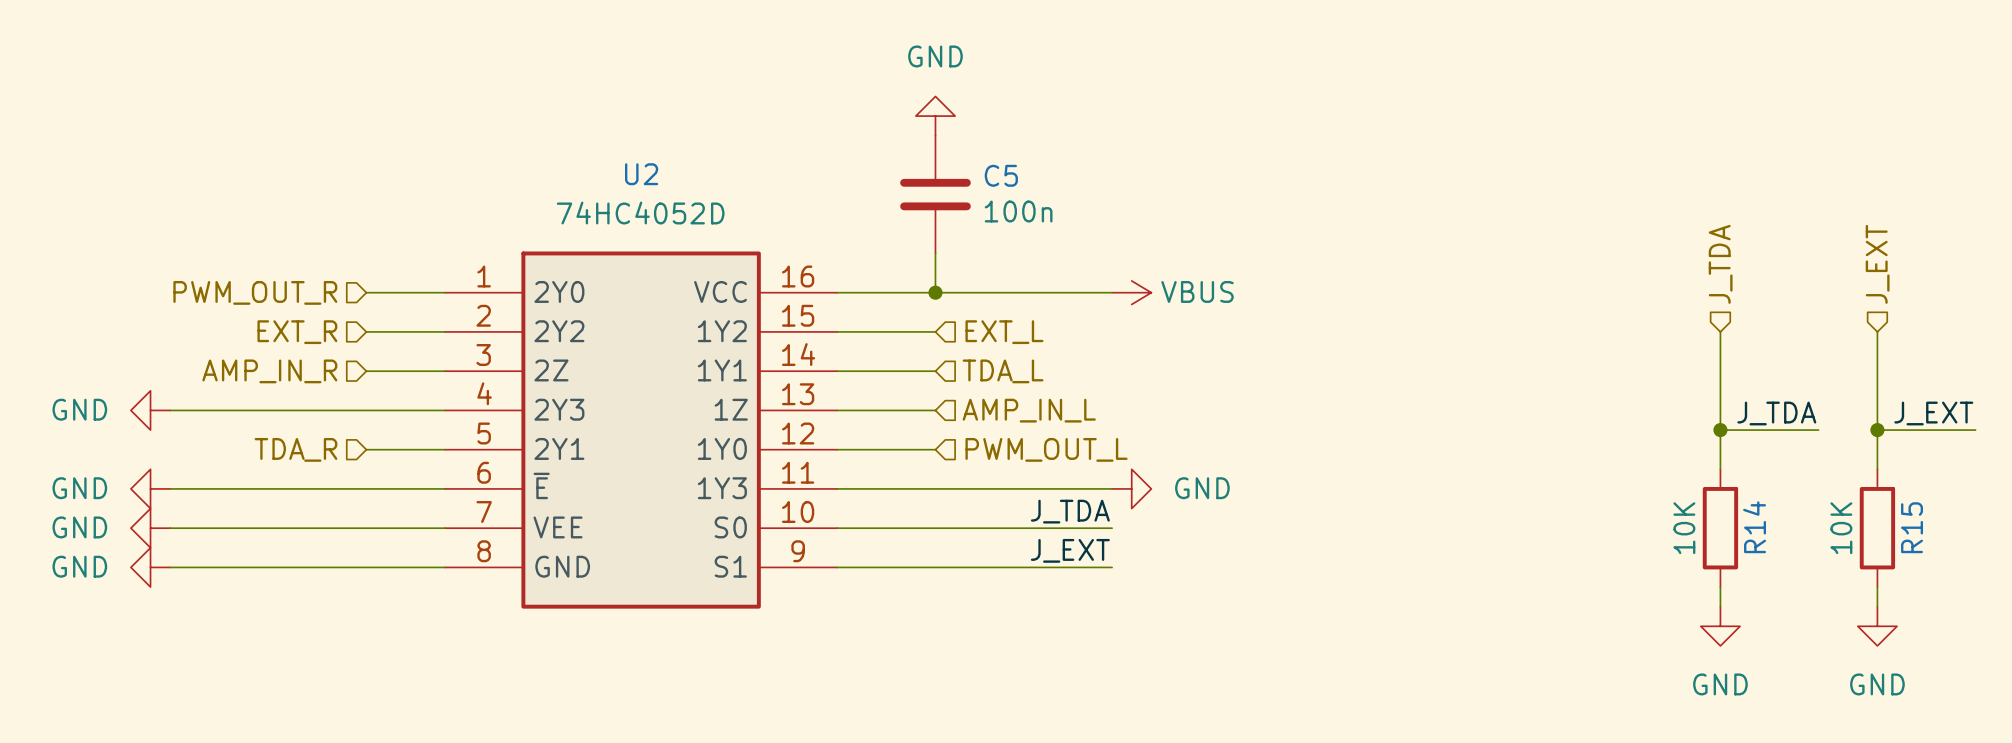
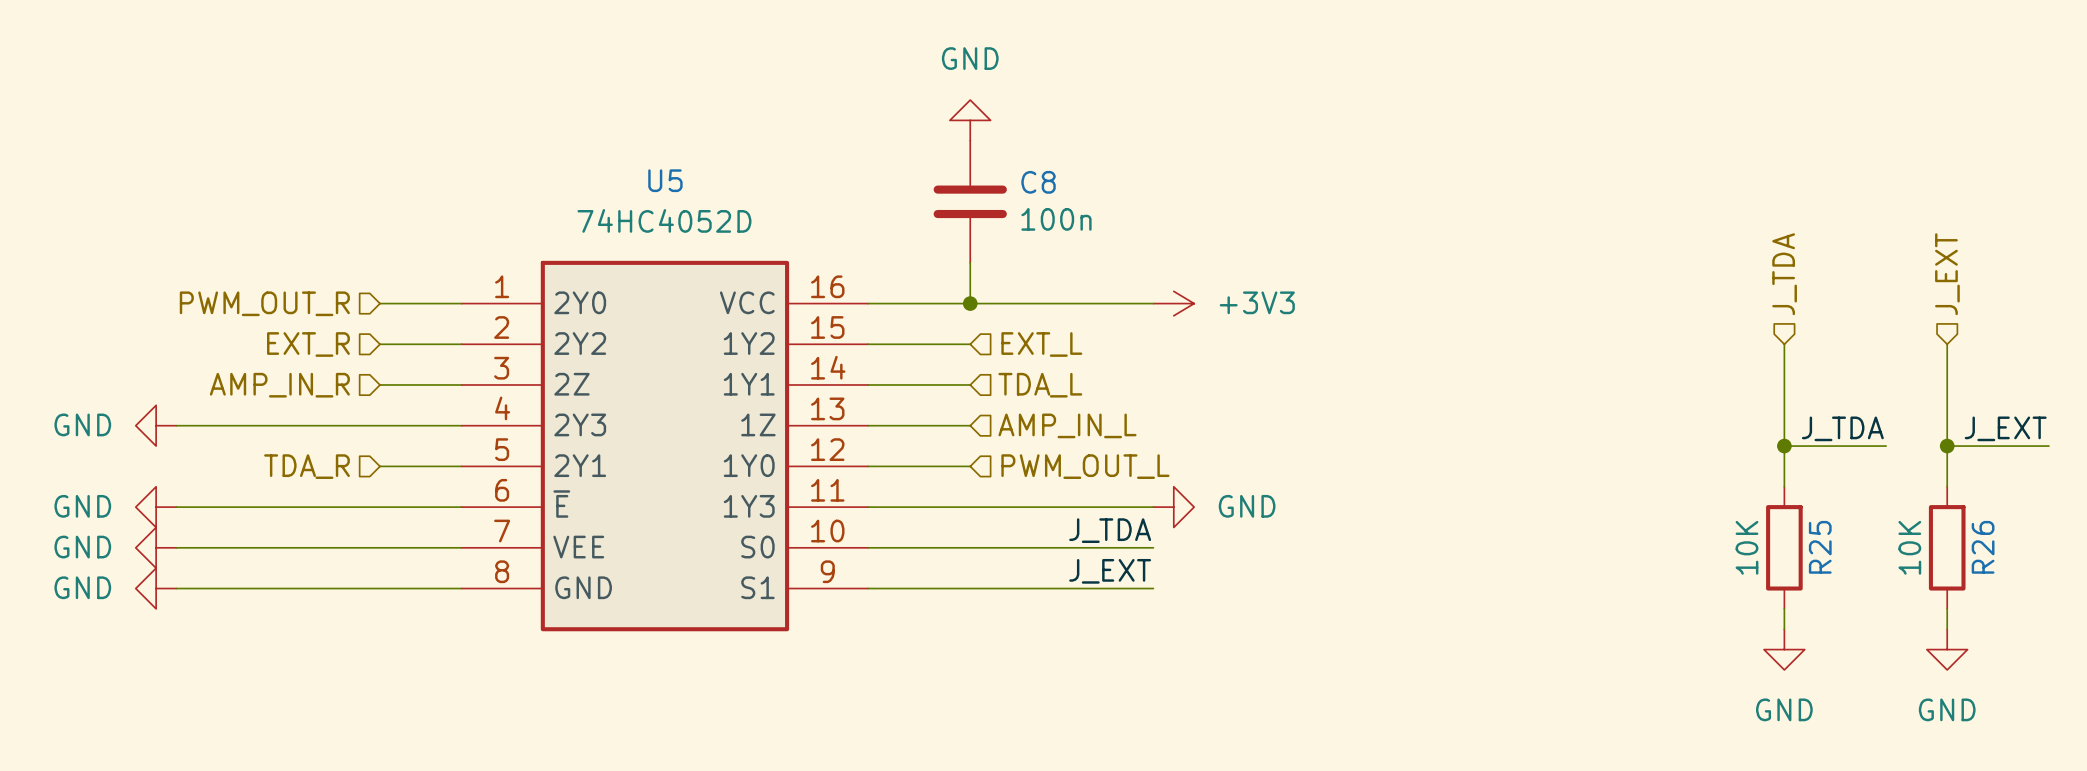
U2 name: U2 (641, 174) -> U5 (665, 180)
C5 name: C5 (1001, 175) -> C8 (1038, 182)
power symbol: VBUS (1131, 292) -> +3V3 (1173, 303)
R14 name: R14 (1754, 527) -> R25 (1820, 547)
R15 name: R15 (1912, 527) -> R26 (1983, 547)

